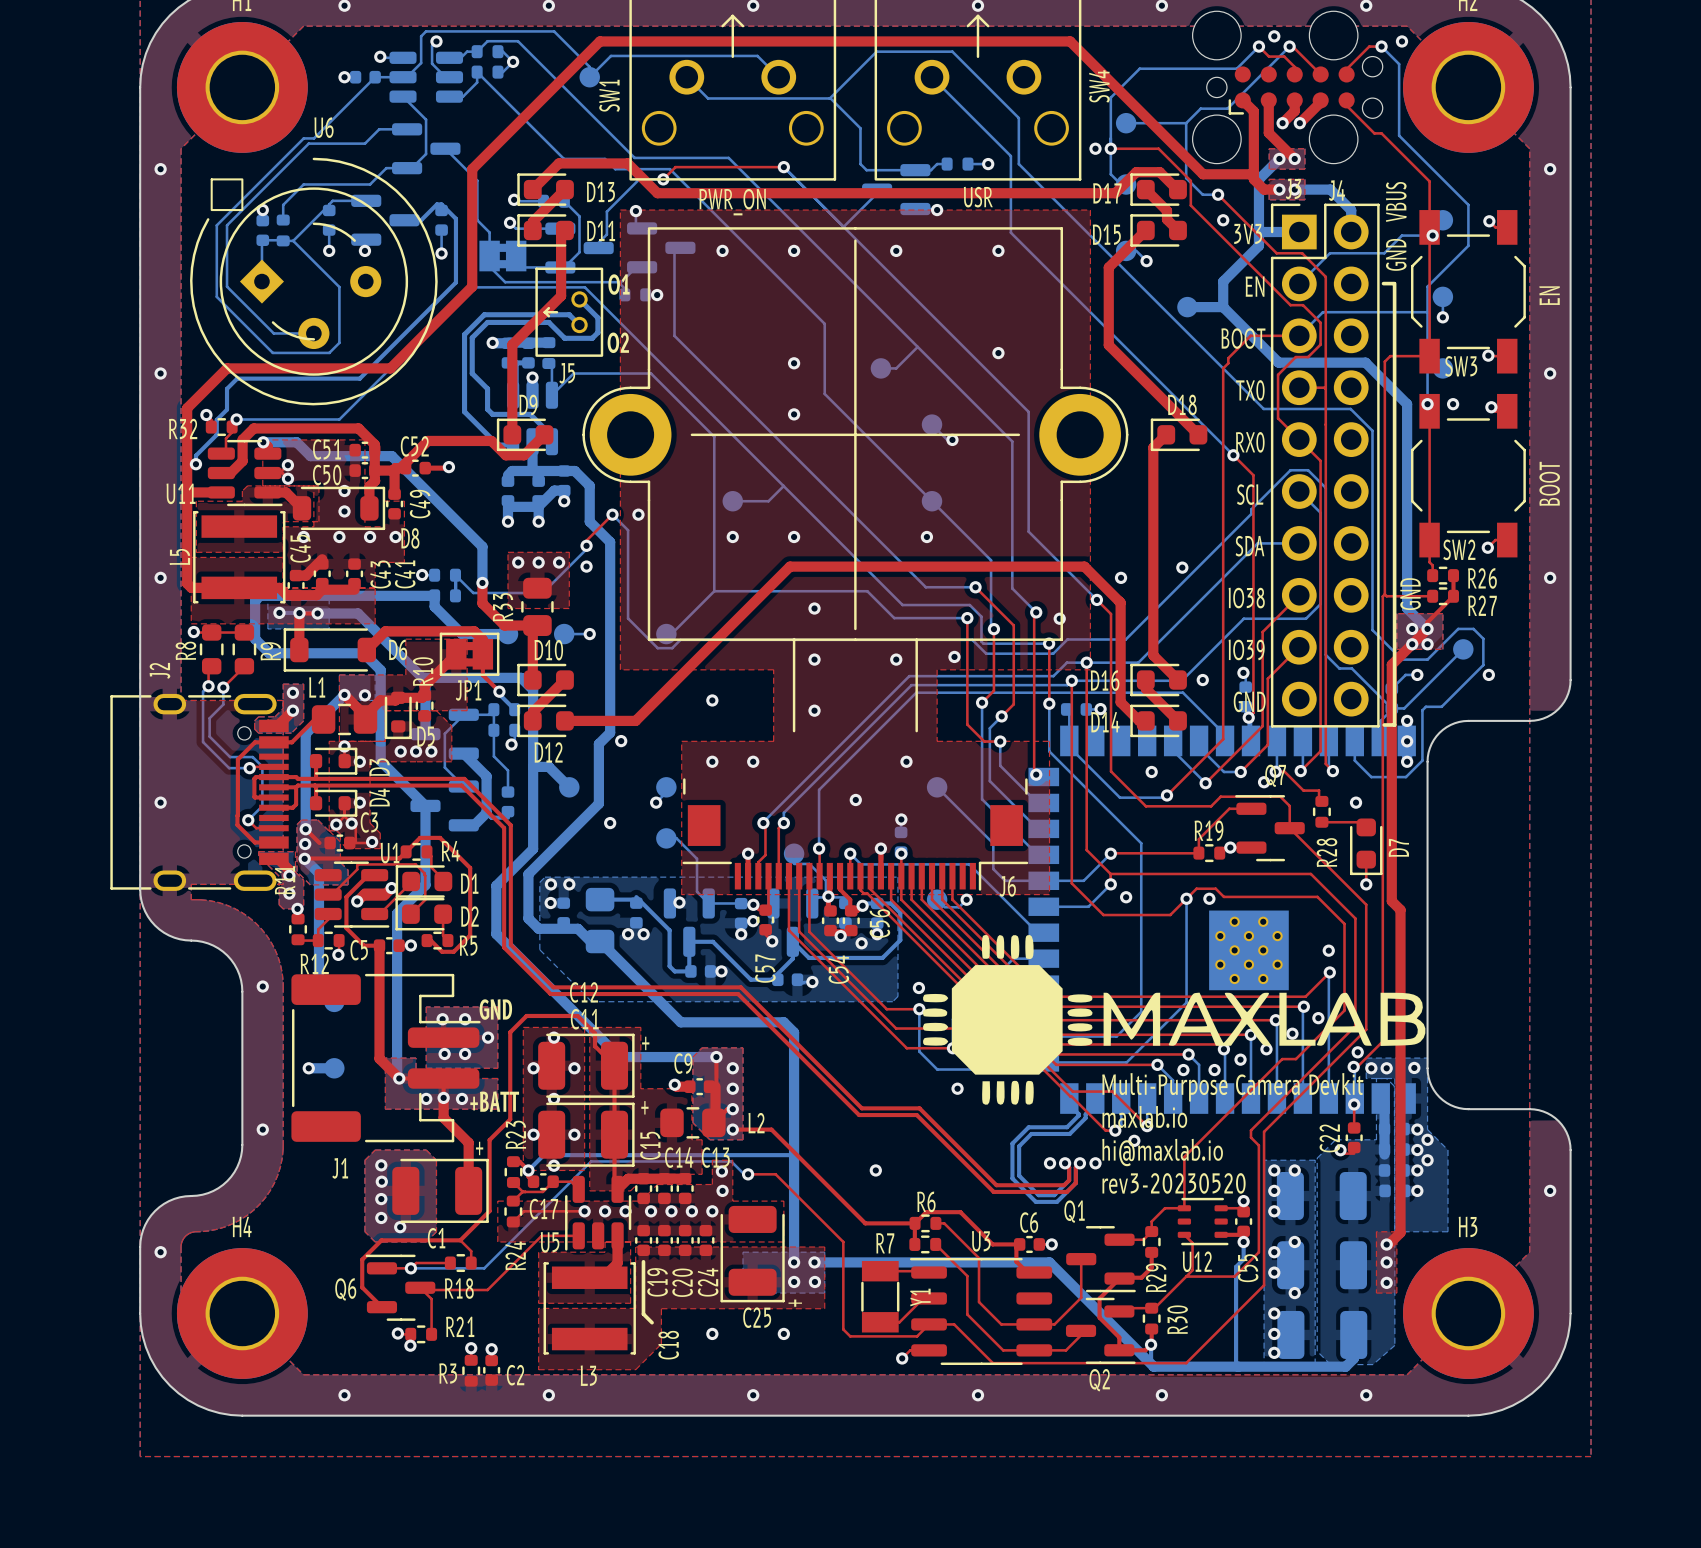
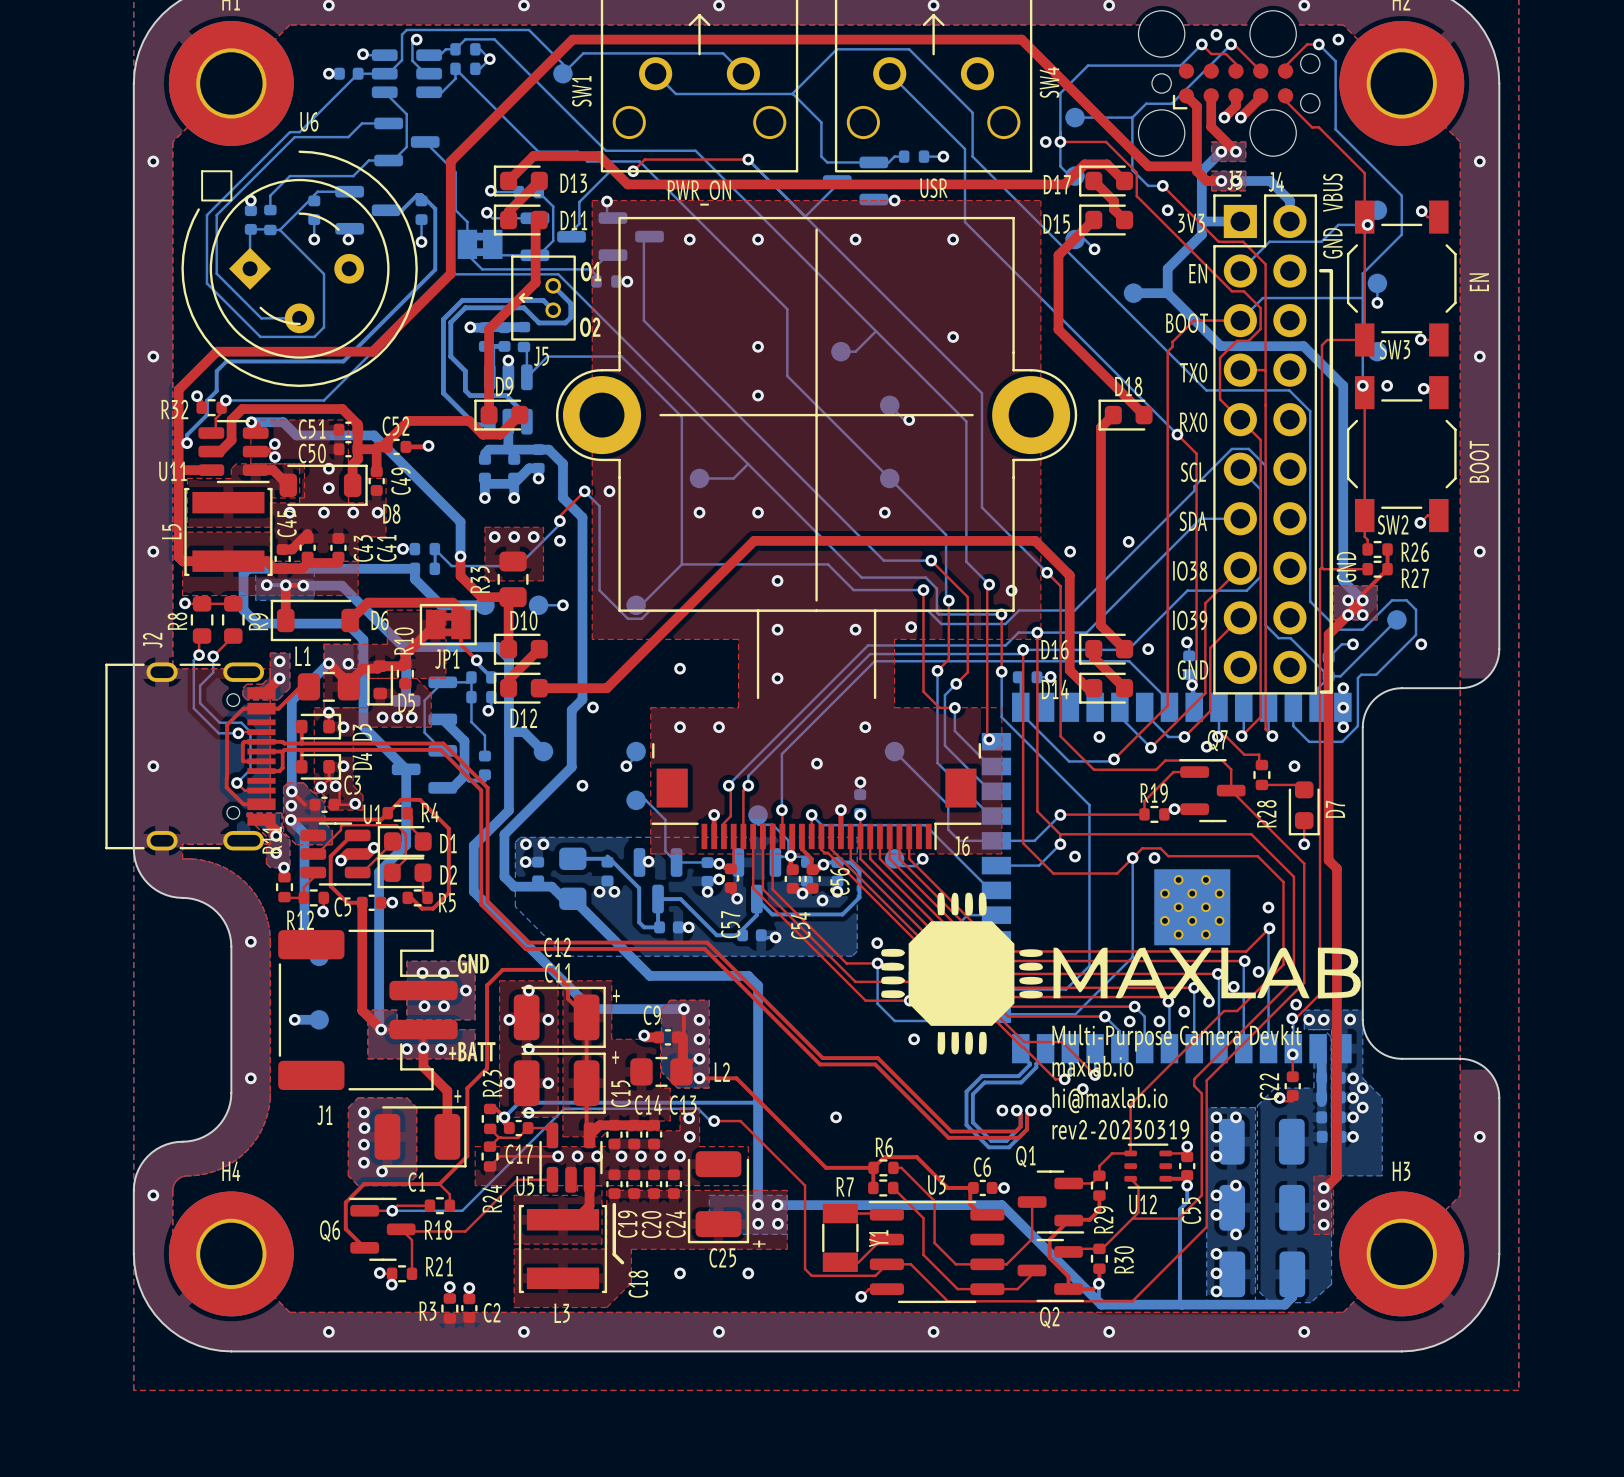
text: rev3-20230520 (1174, 1183) -> rev2-20230319 (1120, 1129)

